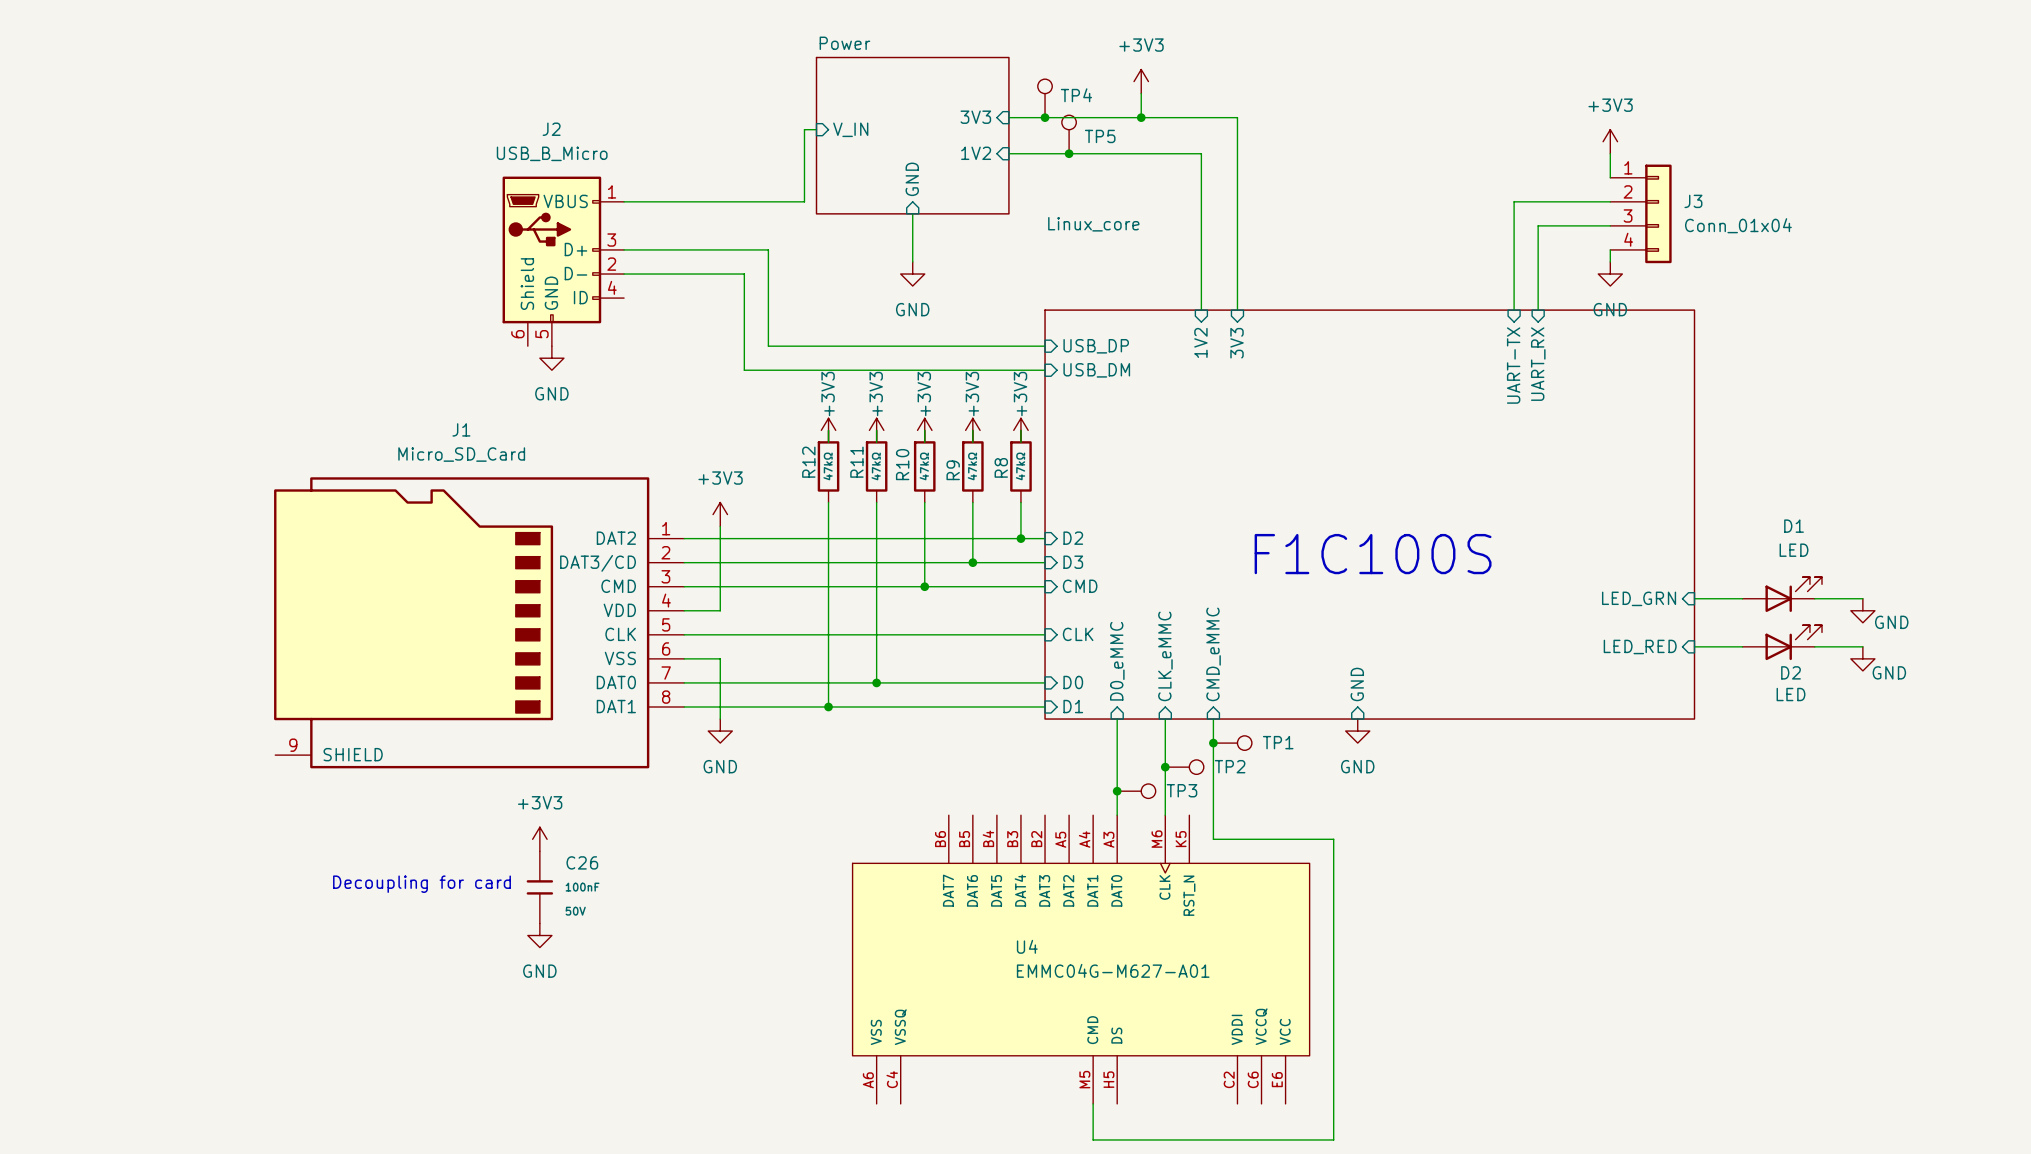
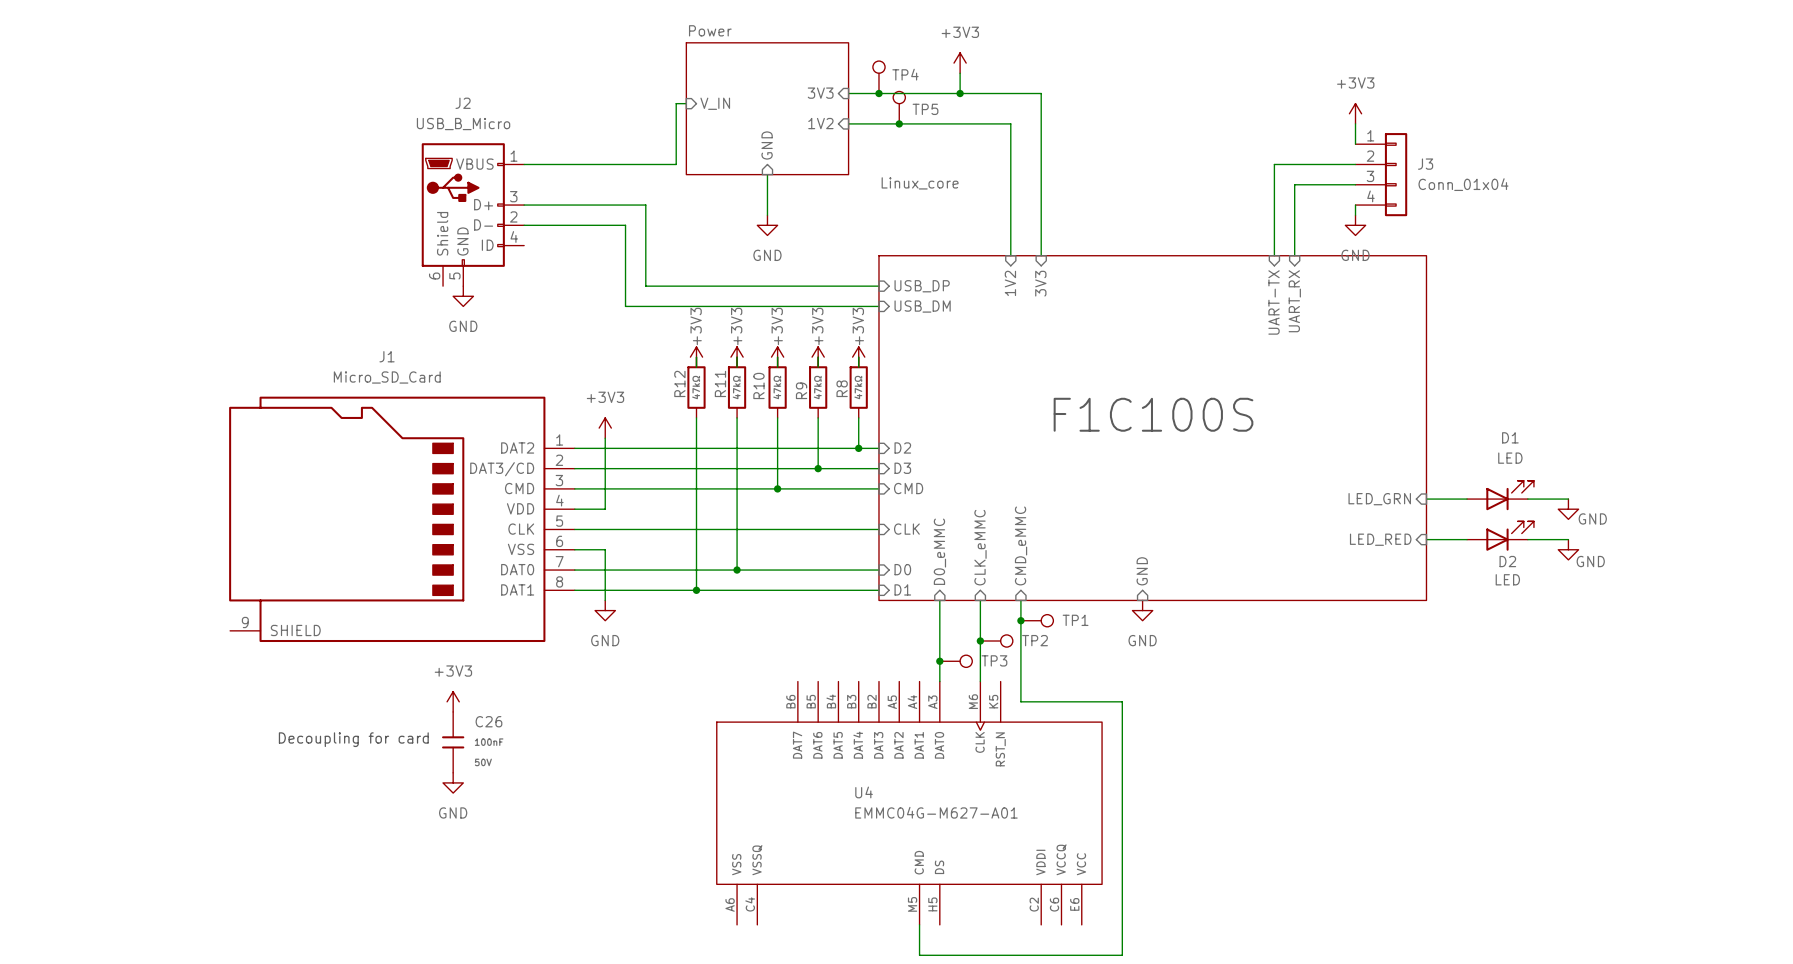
text position: F1C100S (1373, 554) -> F1C100S (1153, 414)

